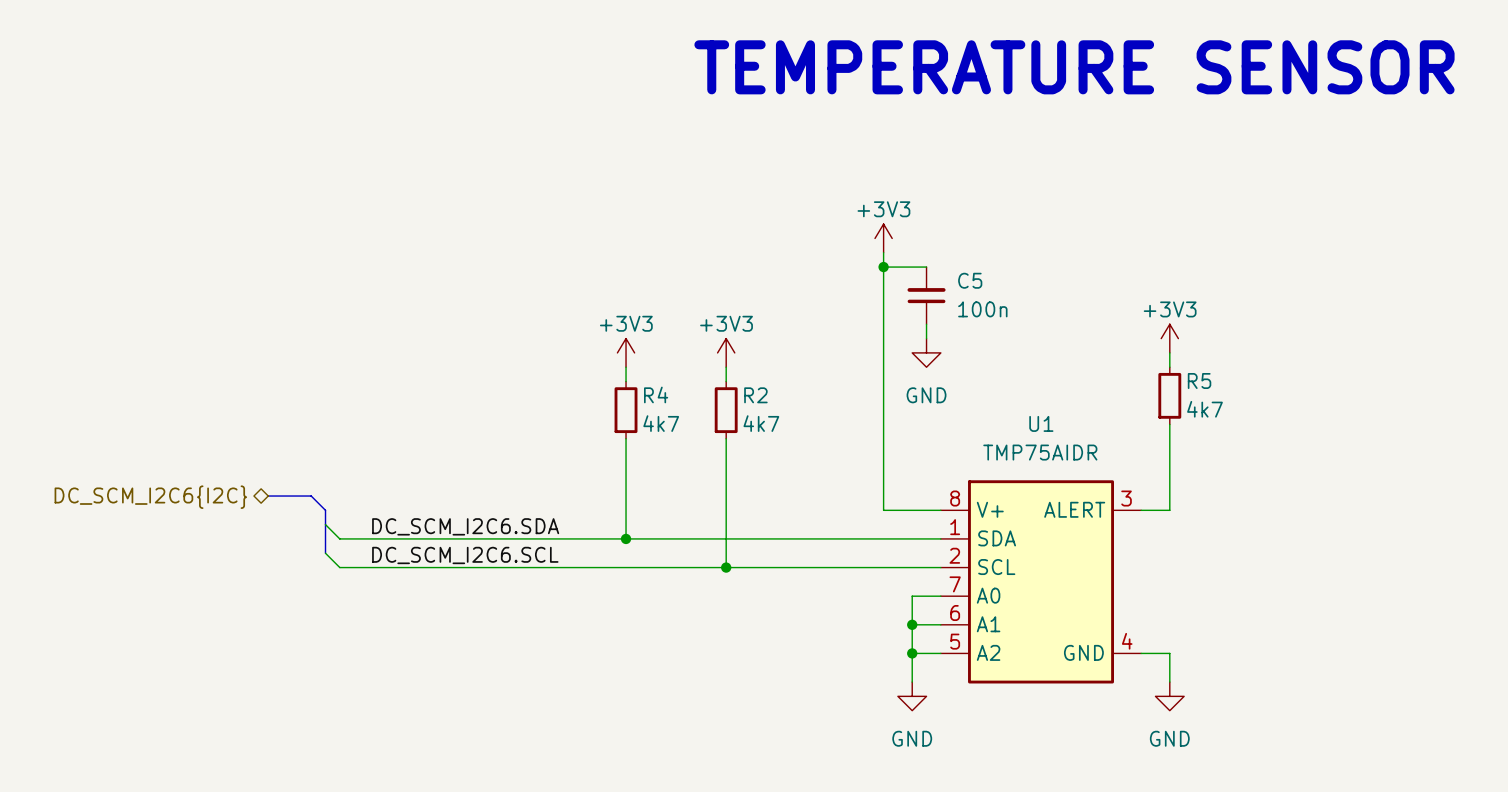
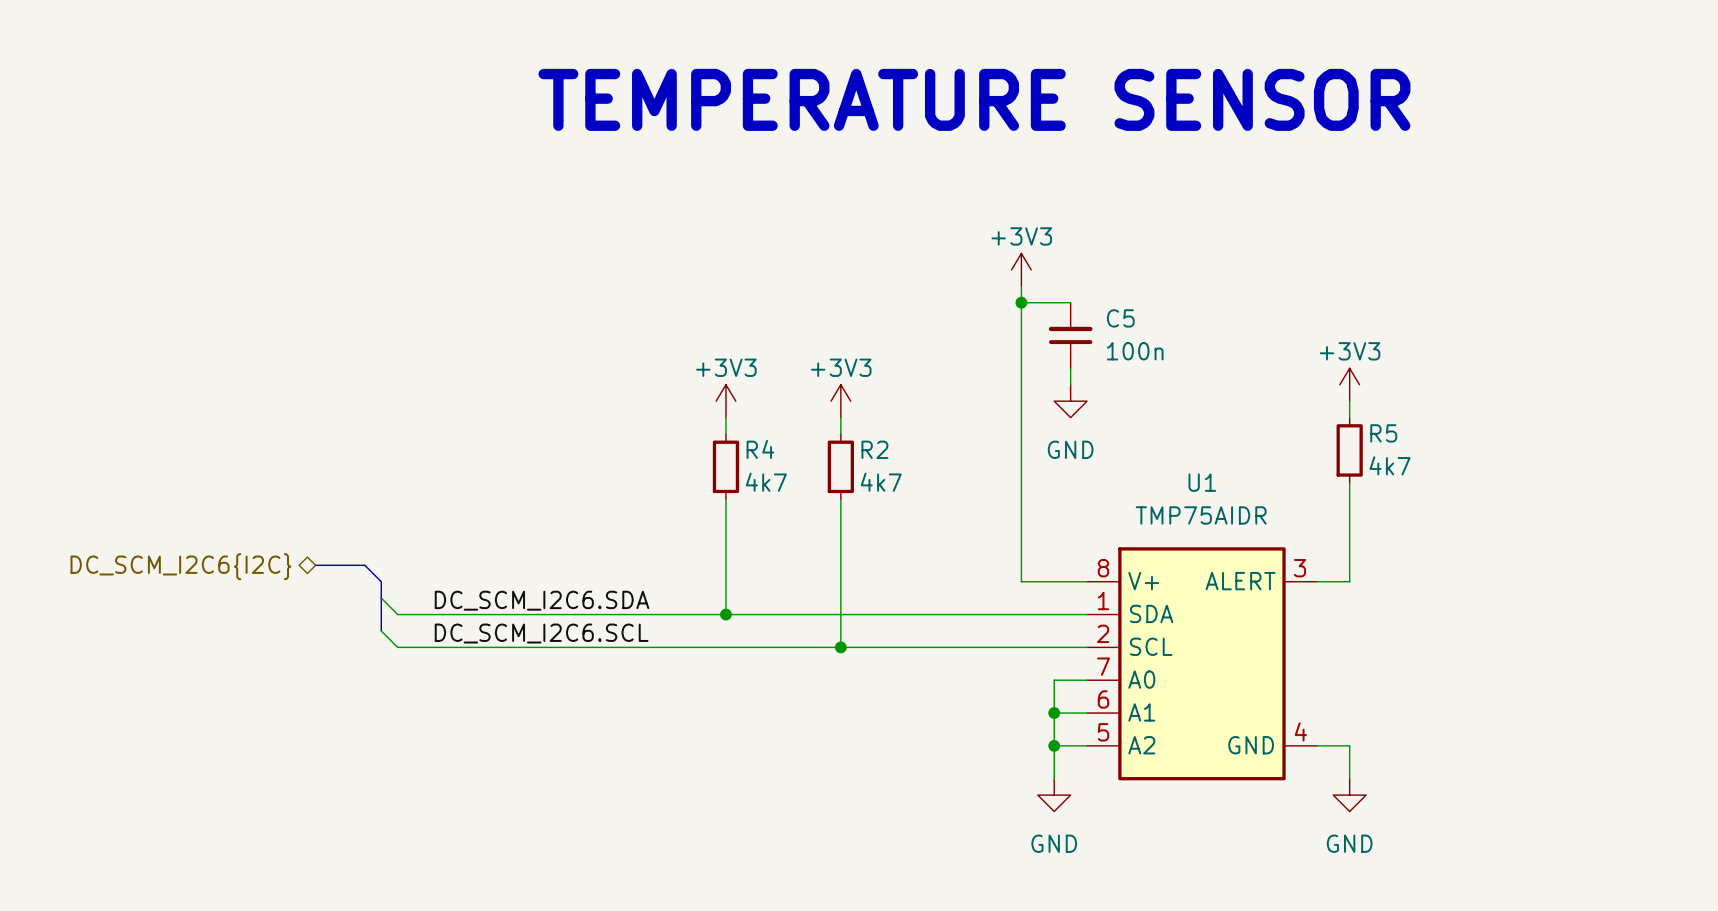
text position: TEMPERATURE SENSOR (1074, 67) -> TEMPERATURE SENSOR (974, 99)

